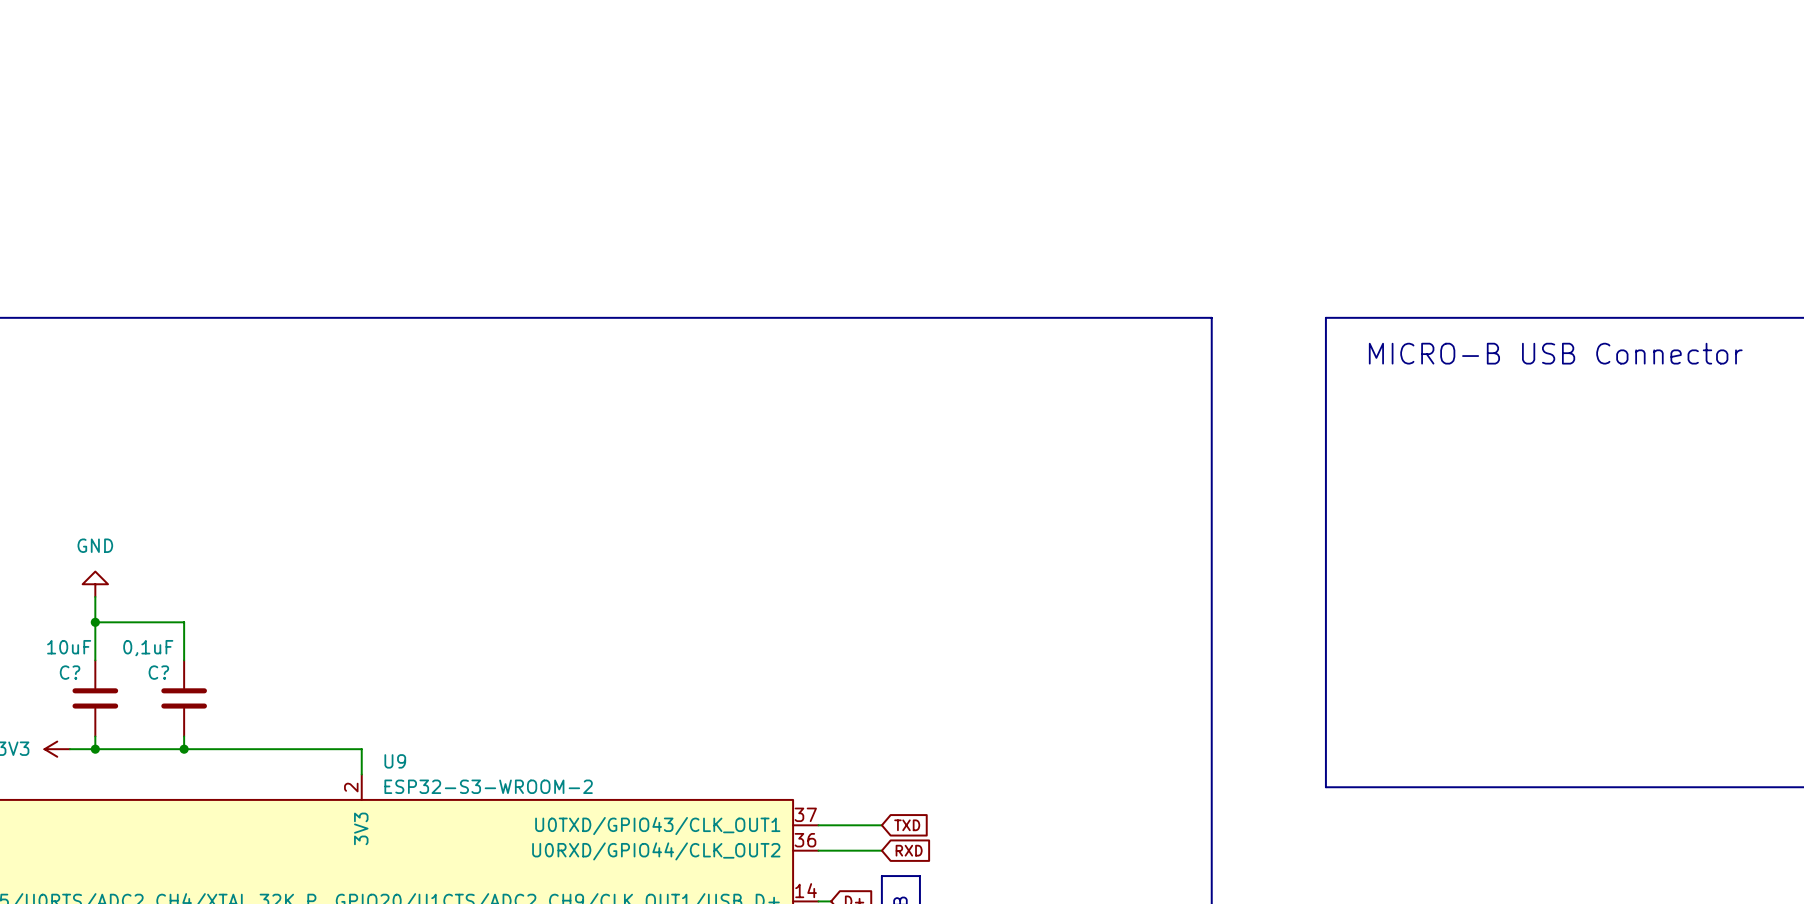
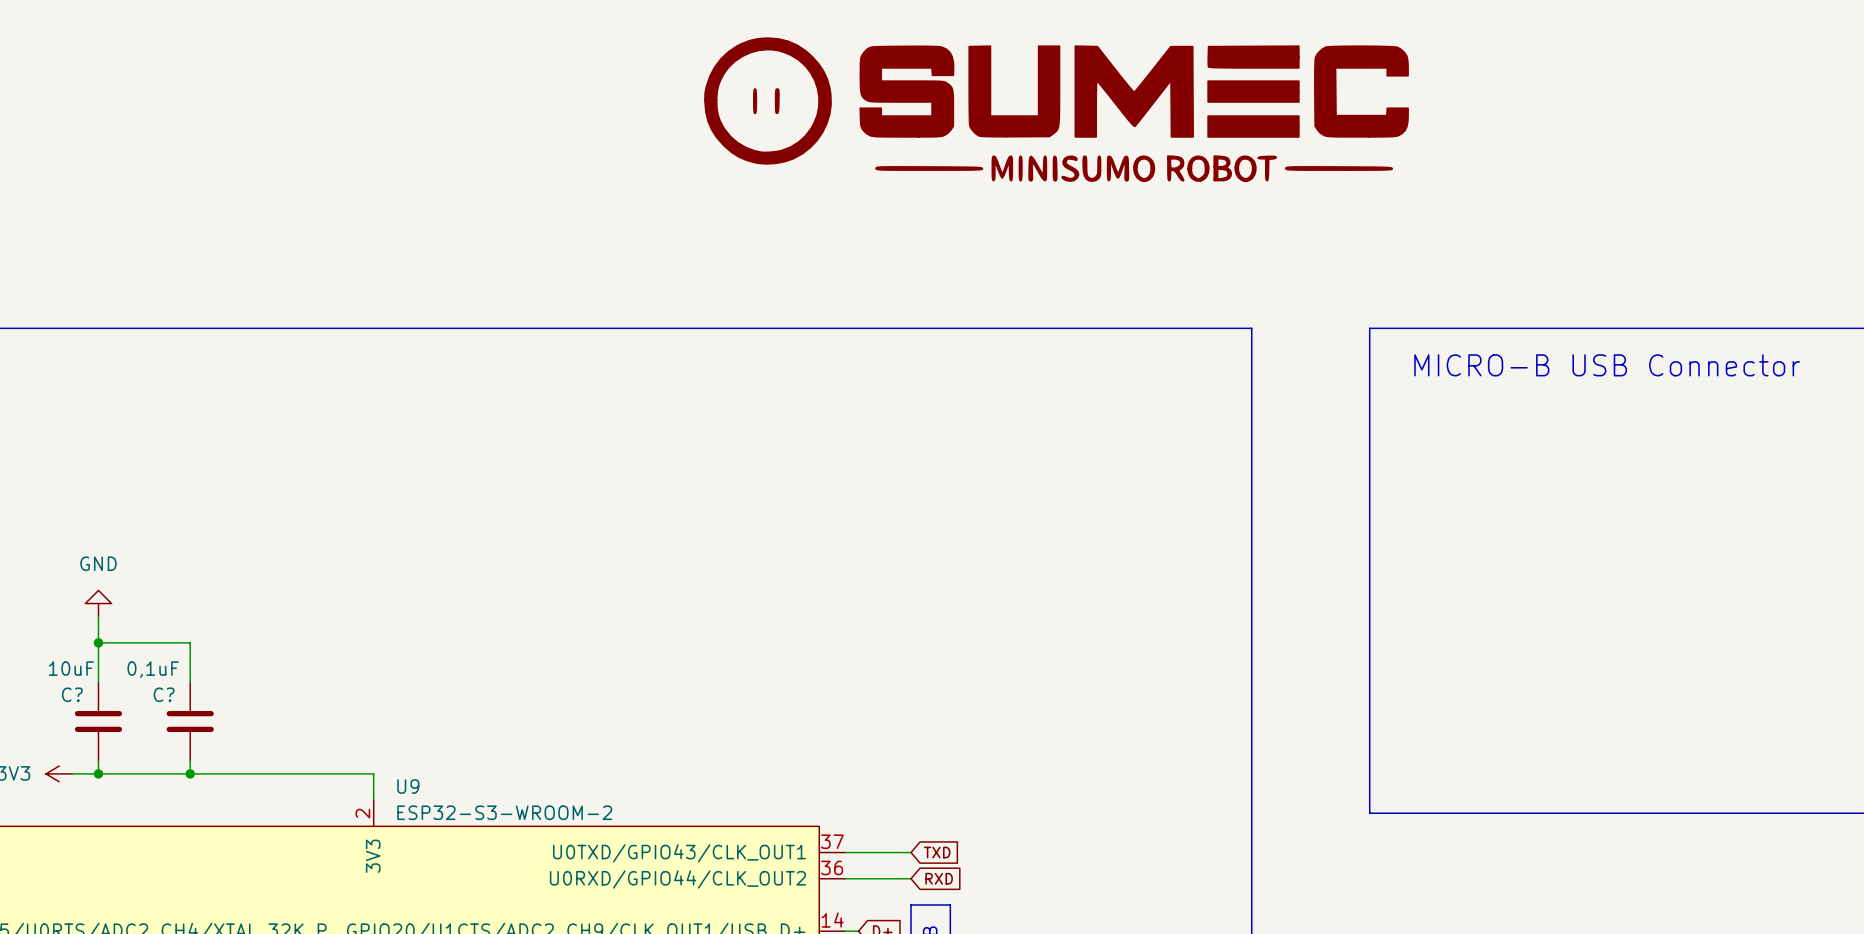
power symbol: none -> (1056, 109)

